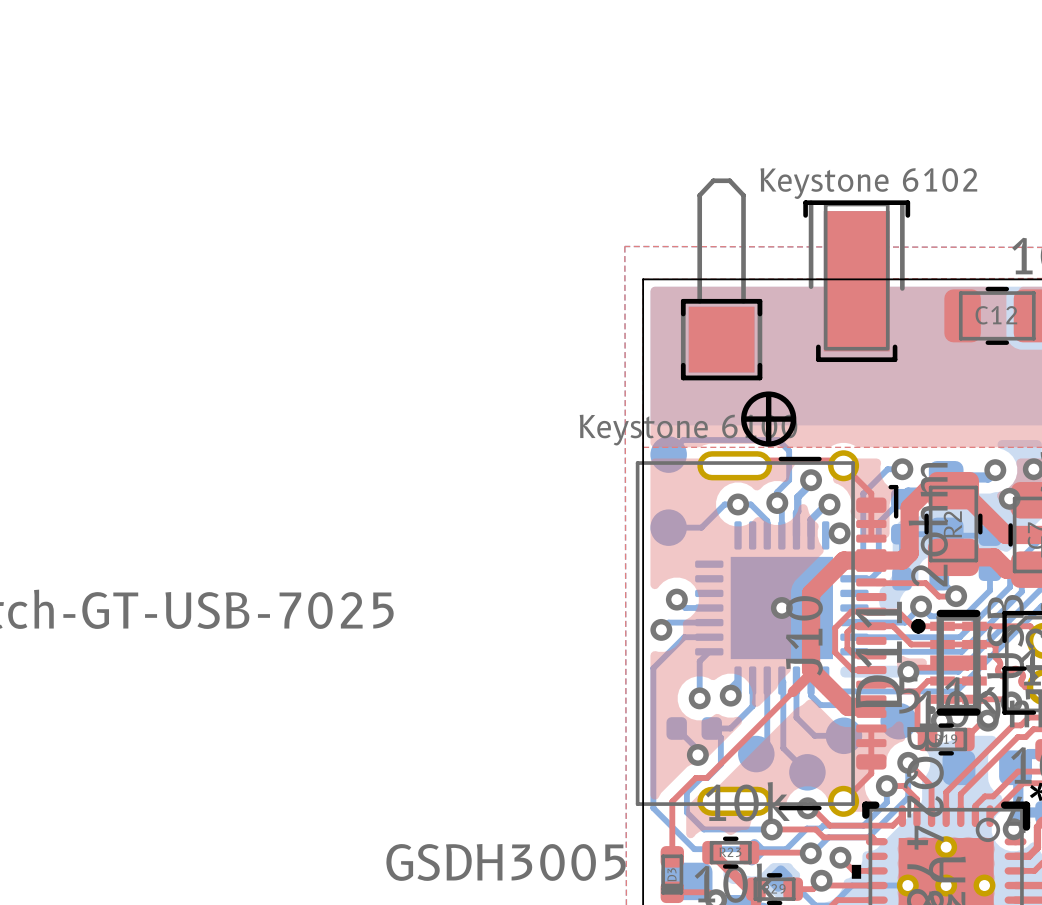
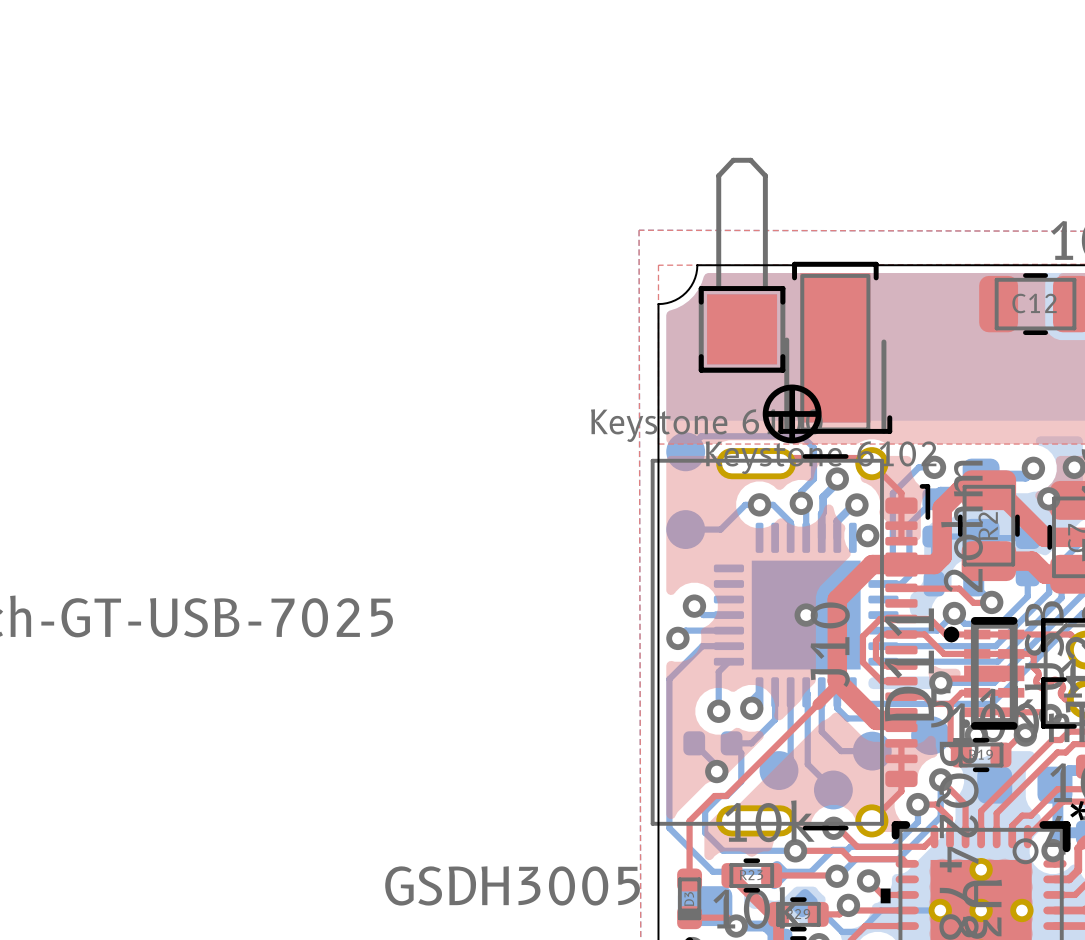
board edge: (679, 279) (643, 279) (643, 315) -> (697, 265) (695, 278) (685, 292) (671, 301) (658, 304)
part rotation: 0° (856, 281) -> 180° (835, 347)

